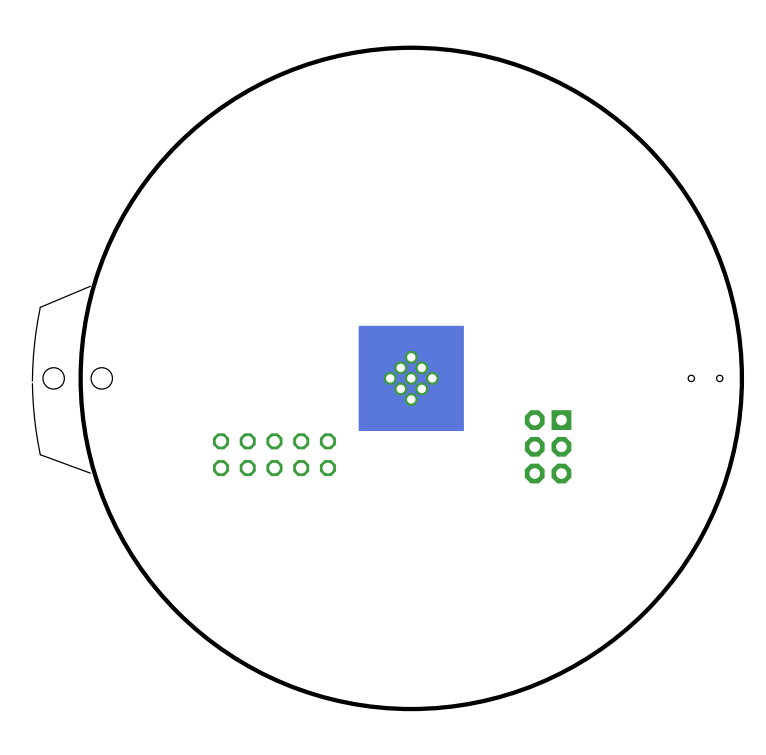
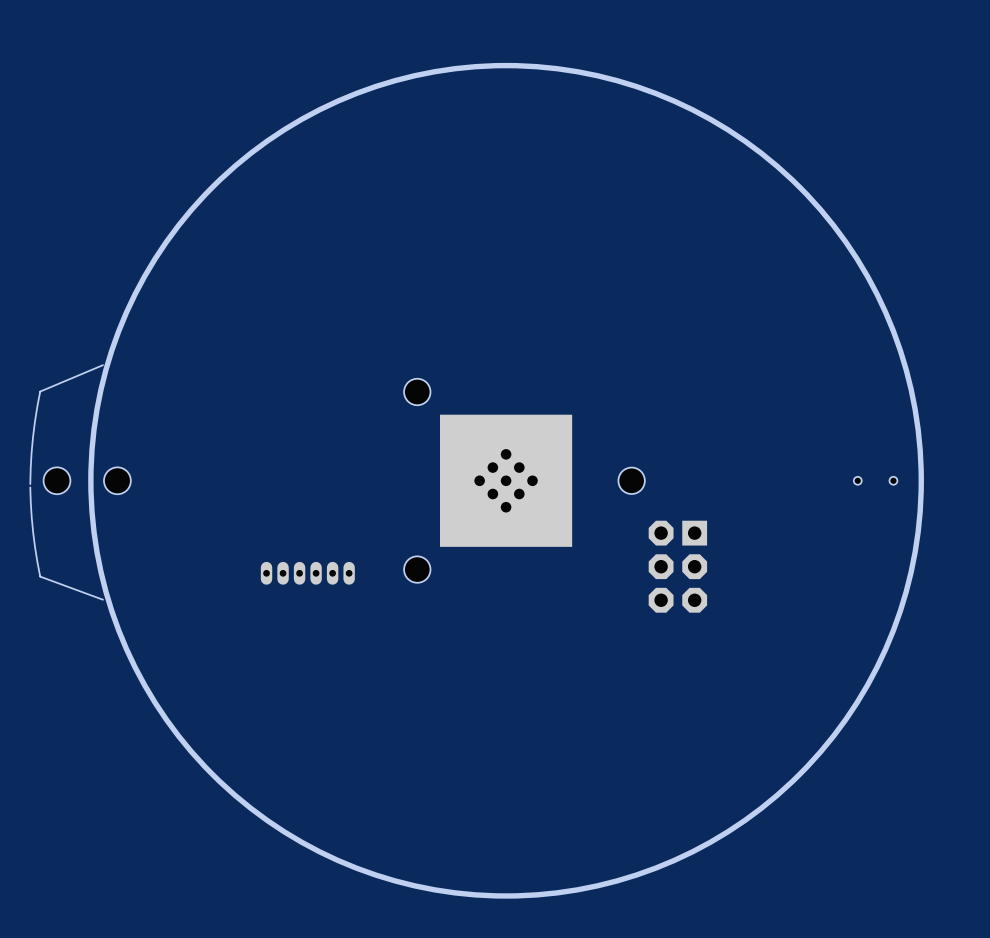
hole: none -> (417, 392)
hole: none -> (631, 480)
hole: none -> (417, 569)
part: none -> (307, 573)
part: (274, 454) -> none

